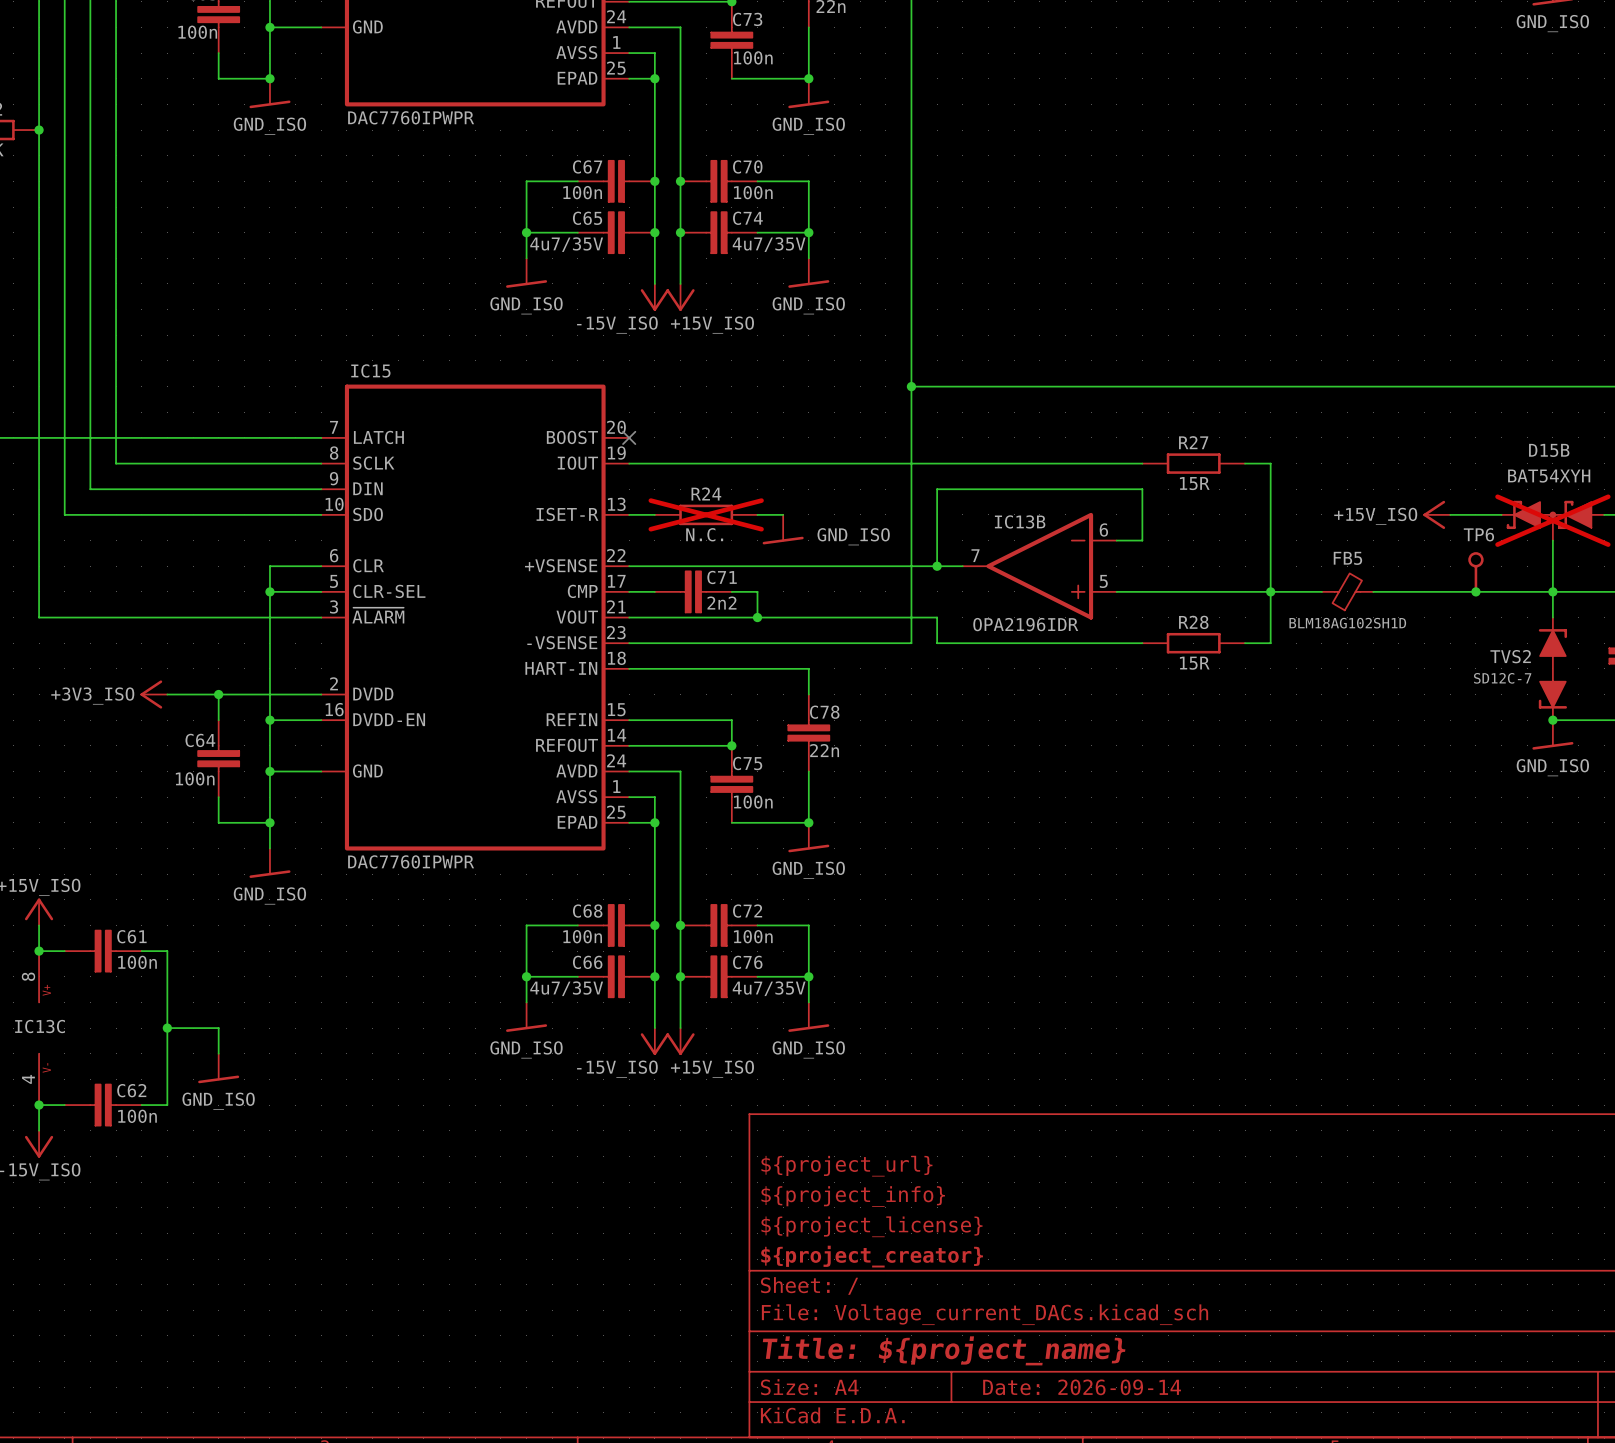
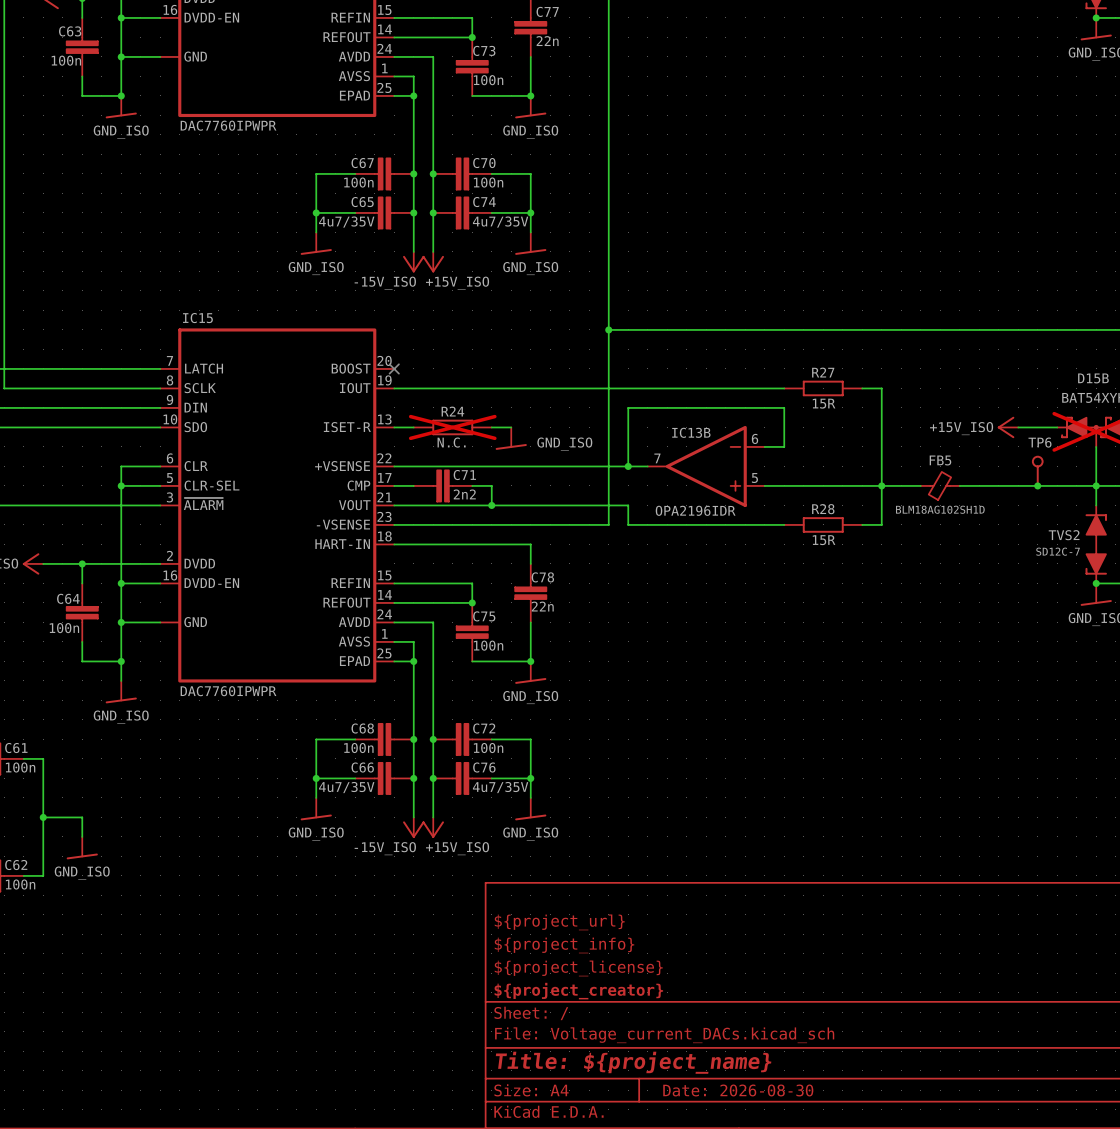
title block: Date: 2026-09-14 (1082, 1387) -> Date: 2026-08-30 (738, 1090)

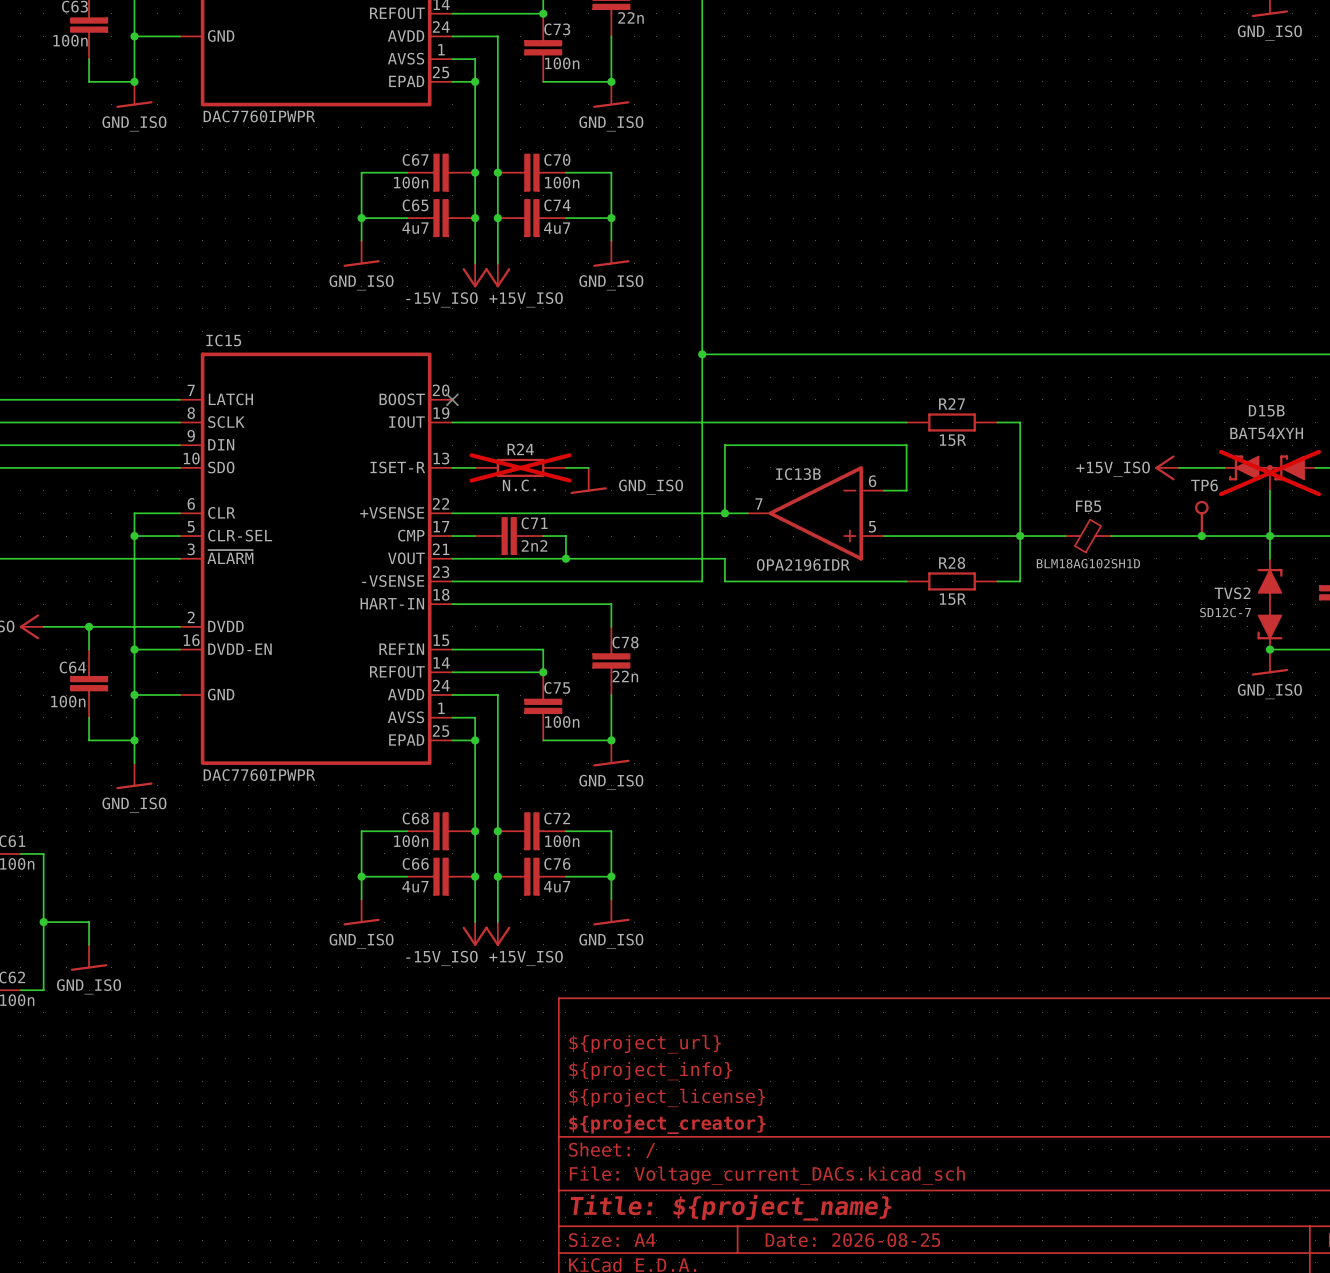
C65 value: 4u7/35V (346, 222) -> 4u7 (415, 228)
C74 value: 4u7/35V (500, 222) -> 4u7 (557, 228)
C66 value: 4u7/35V (346, 787) -> 4u7 (415, 886)
C76 value: 4u7/35V (500, 787) -> 4u7 (557, 886)
title block: Date: 2026-08-30 (738, 1090) -> Date: 2026-08-25 (852, 1240)

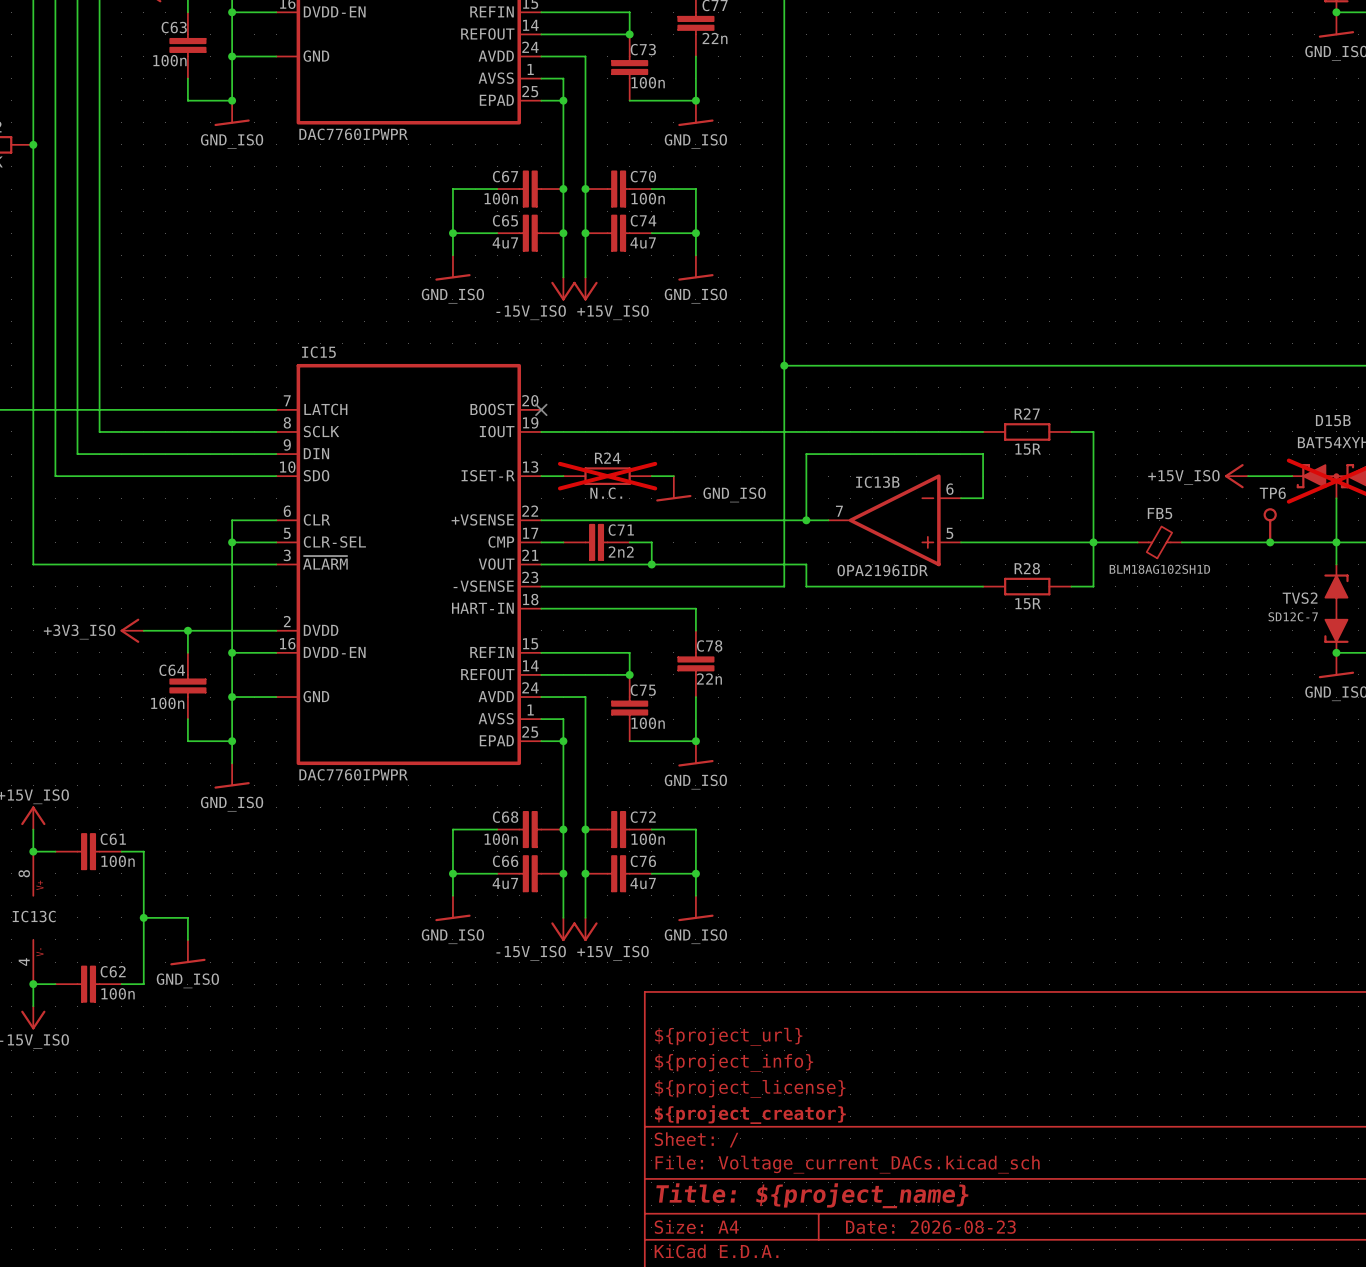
title block: Date: 2026-08-25 (852, 1240) -> Date: 2026-08-23 (930, 1227)

